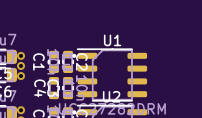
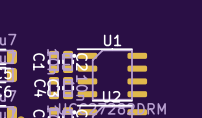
via: (21, 55) -> none
via: (21, 65) -> none
via: (21, 76) -> none
via: (21, 110) -> none

